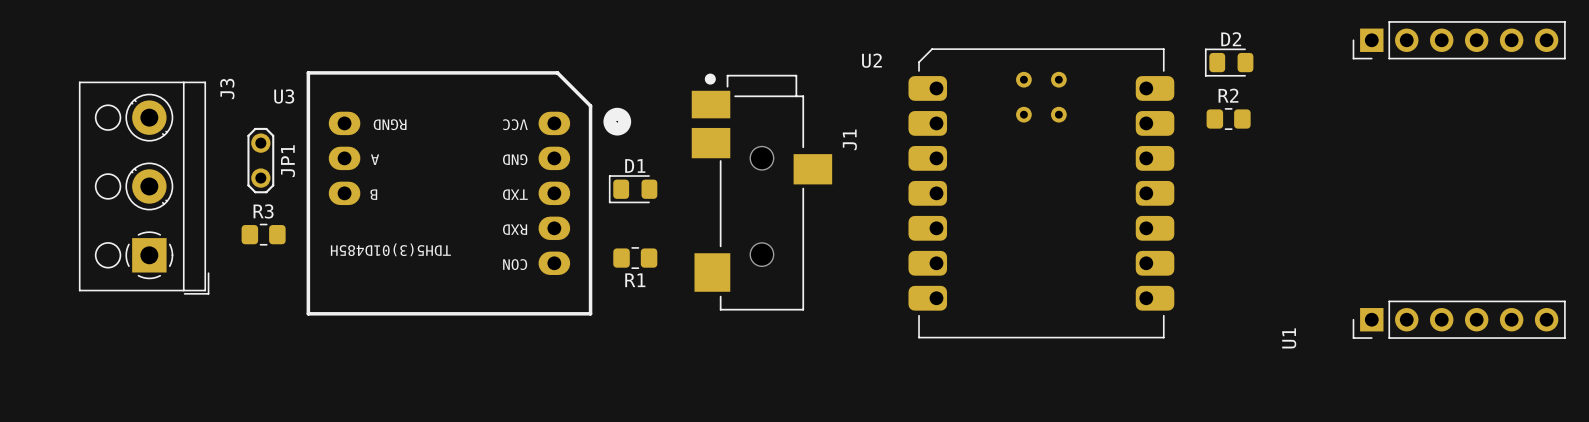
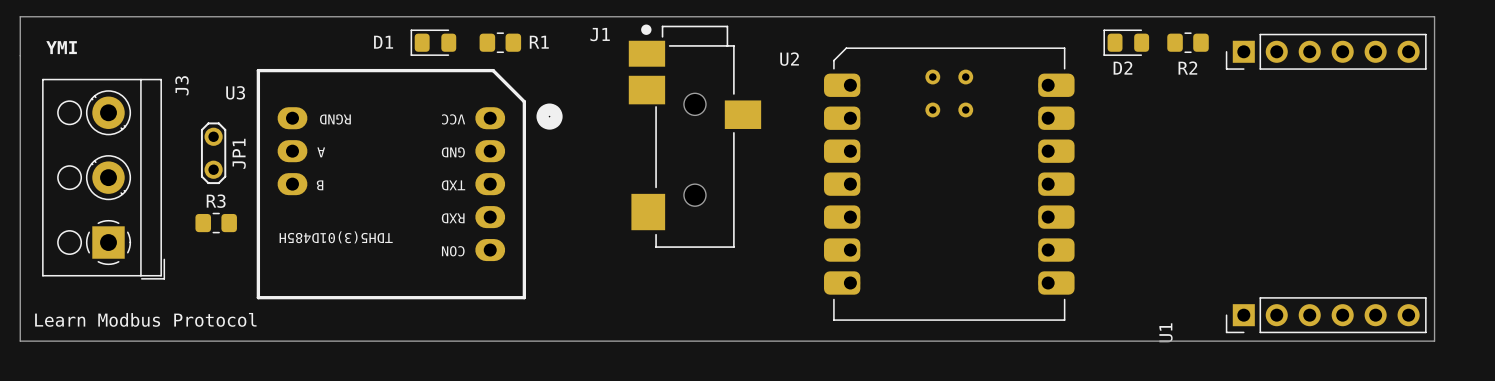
board edge: none -> (20, 16) (20, 341) (1434, 341) (1434, 16) (20, 16)
D2 name position: D2 (1231, 39) -> D2 (1122, 68)
text: none -> YMI (61, 47)
D2 position: (1229, 62) -> (1126, 42)
R2 name position: R2 (1228, 95) -> R2 (1187, 68)
R2 position: (1228, 119) -> (1188, 42)
J1 name rotation: 0° (849, 139) -> 90° clockwise (600, 34)
J1 name position: J1 (849, 139) -> J1 (600, 34)
D1 name position: D1 (635, 165) -> D1 (383, 42)
U1 position: (1459, 180) -> (1326, 183)
D1 position: (633, 189) -> (433, 42)
J1 position: (761, 192) -> (694, 136)
R1 position: (635, 258) -> (500, 42)
R1 name position: R1 (635, 280) -> R1 (539, 42)
text: none -> Learn Modbus Protocol (145, 319)

